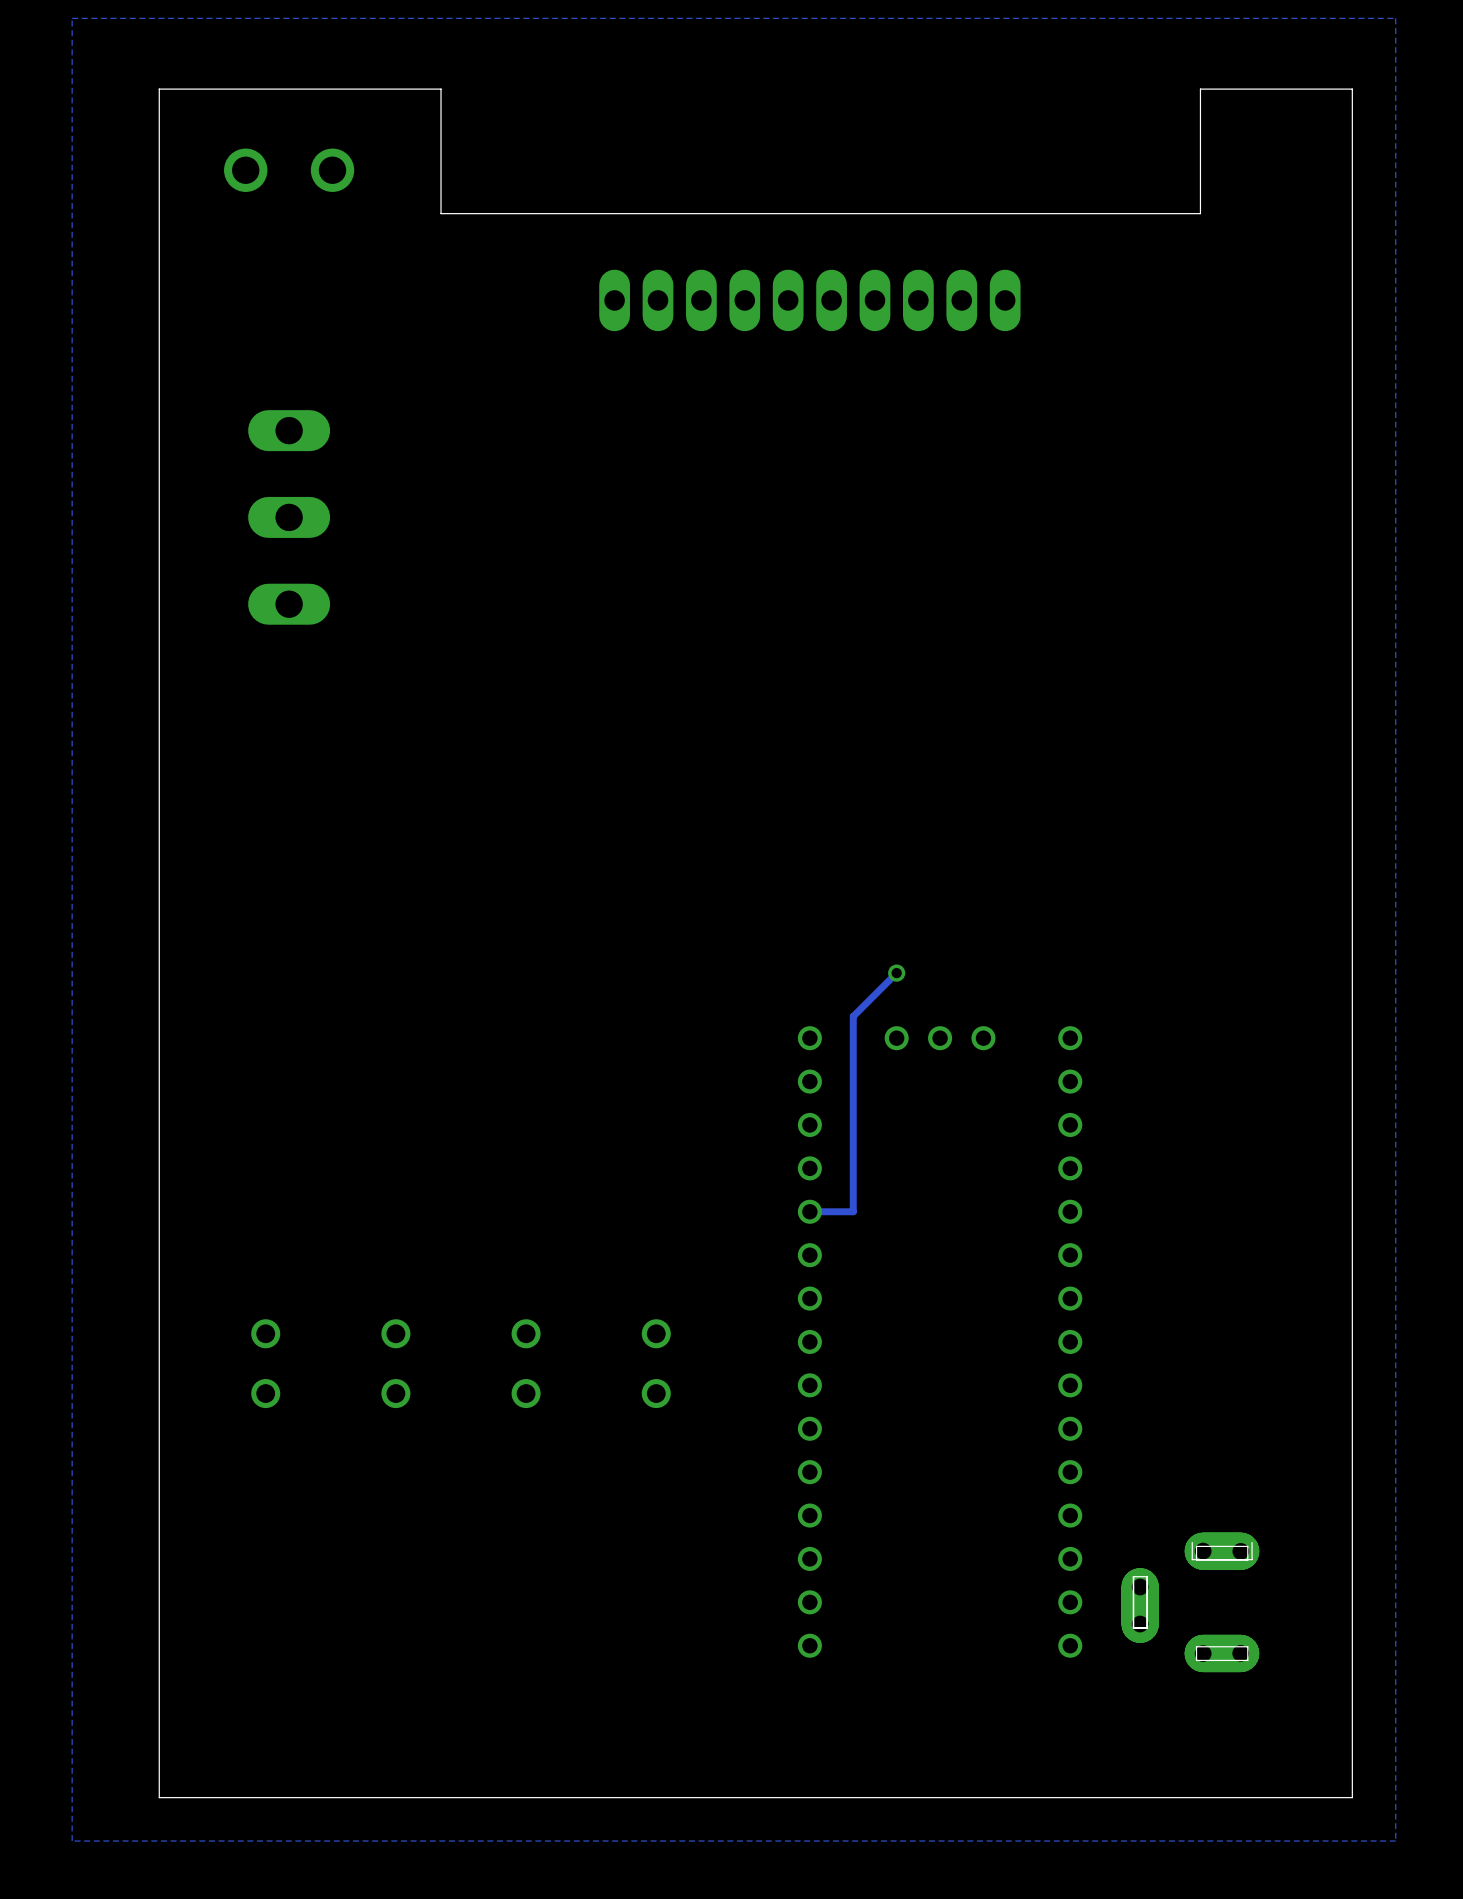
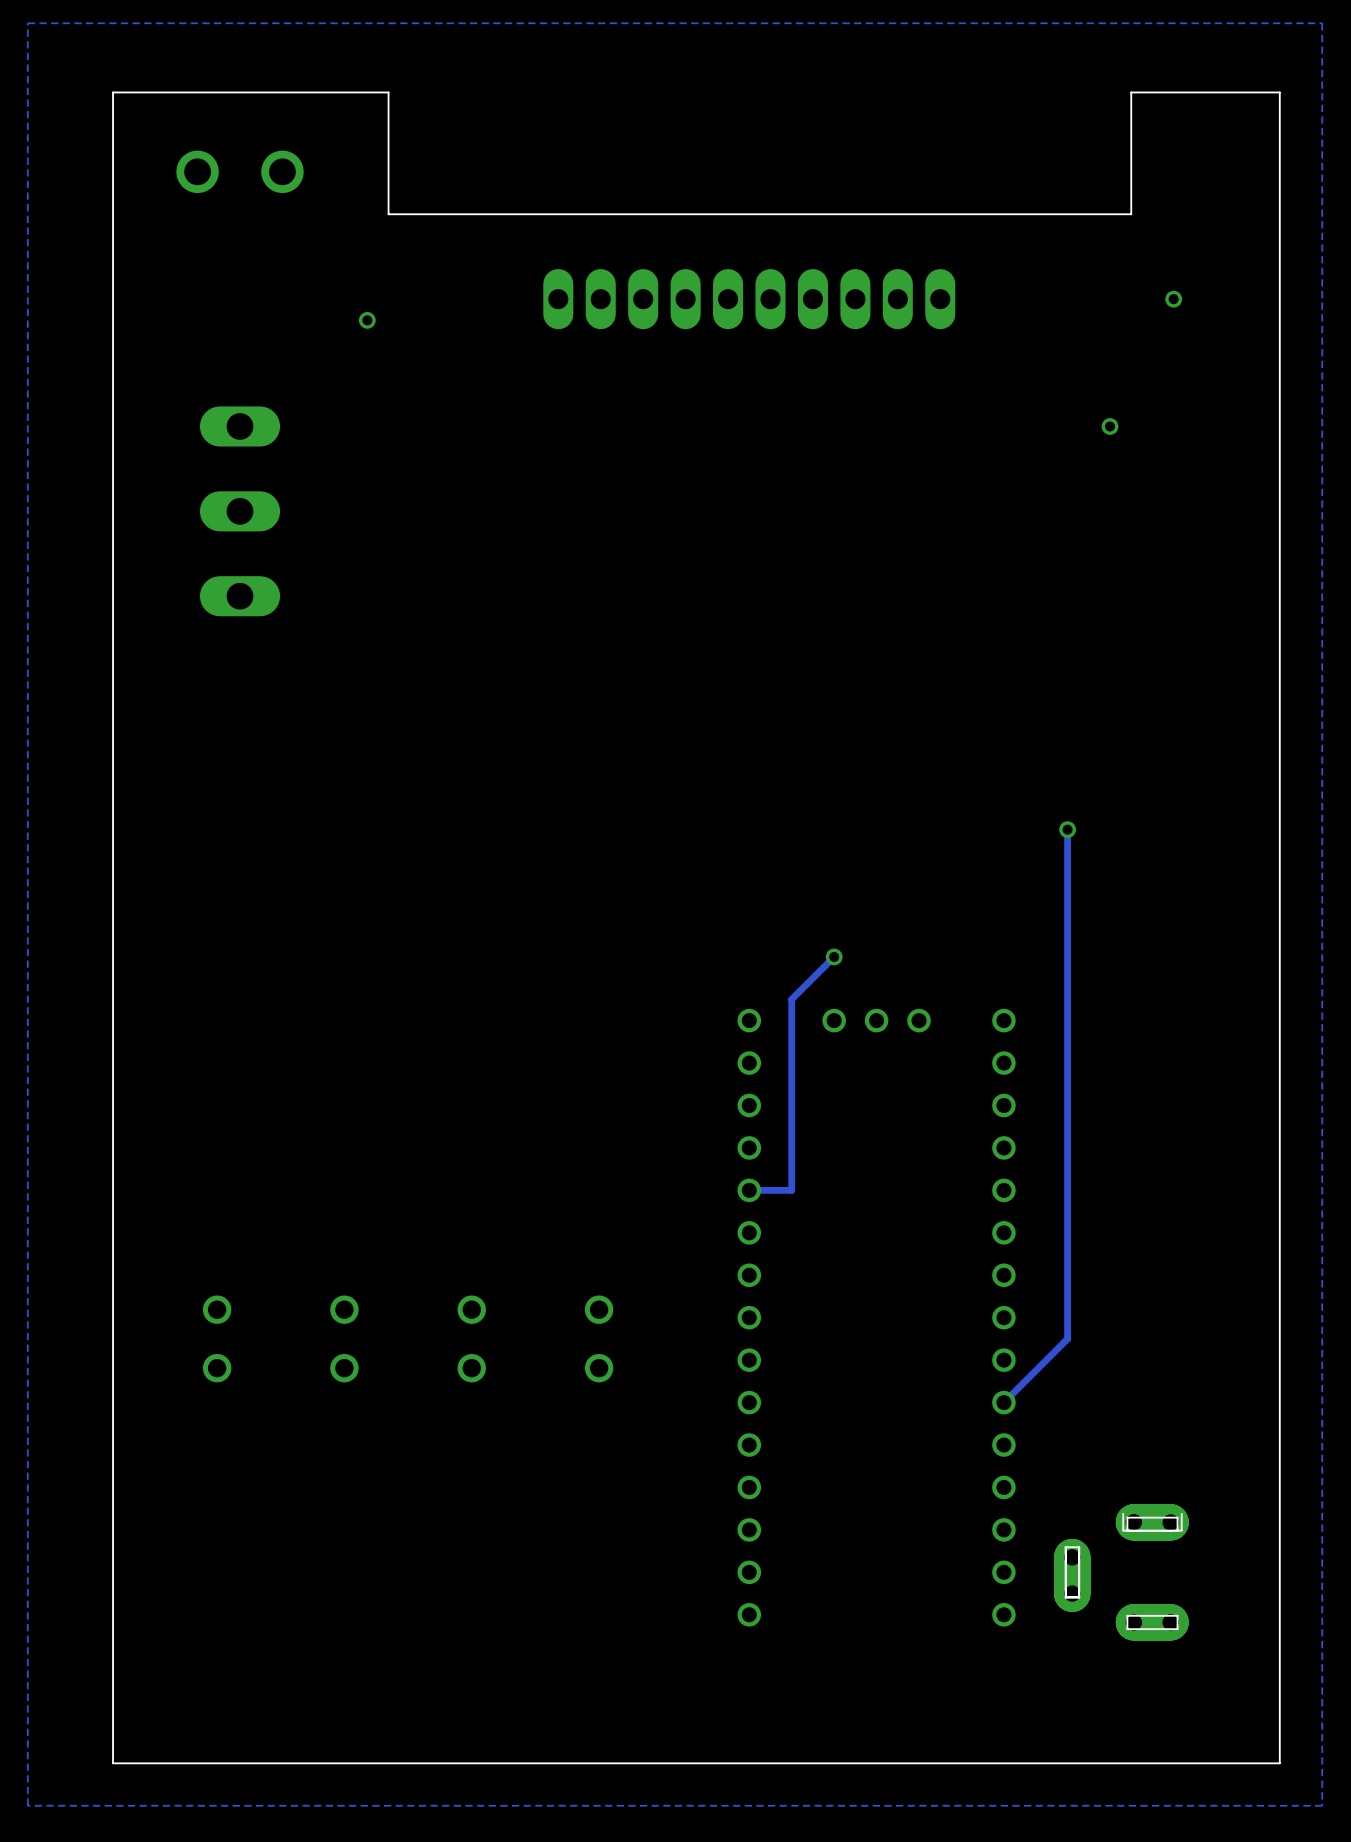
via: none -> (1173, 299)
via: none -> (367, 320)
via: none -> (1110, 426)
track: none -> (1067, 829) (1067, 1338) (1003, 1402)
via: none -> (1067, 829)

